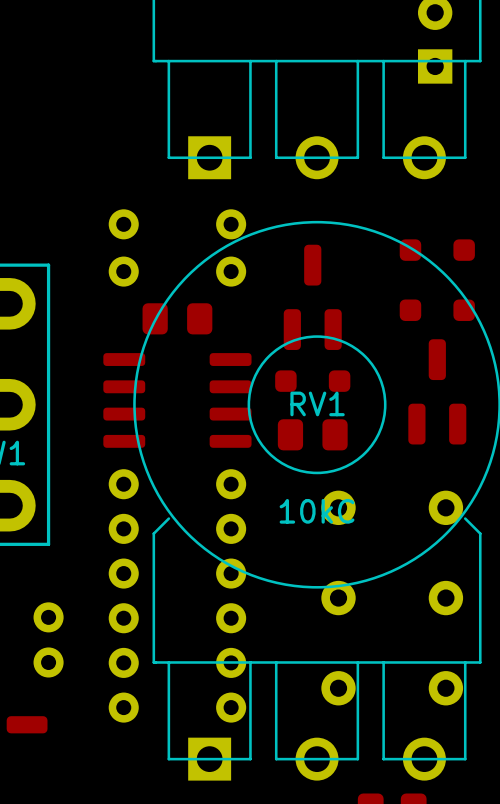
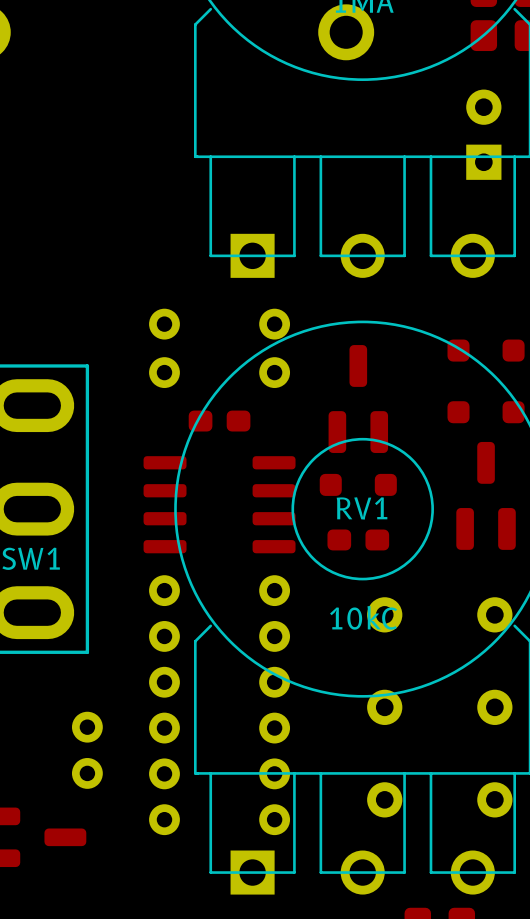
part footprint: [142, 303, 213, 335] -> [188, 410, 251, 432]
part footprint: [277, 419, 348, 451] -> [327, 529, 390, 551]

